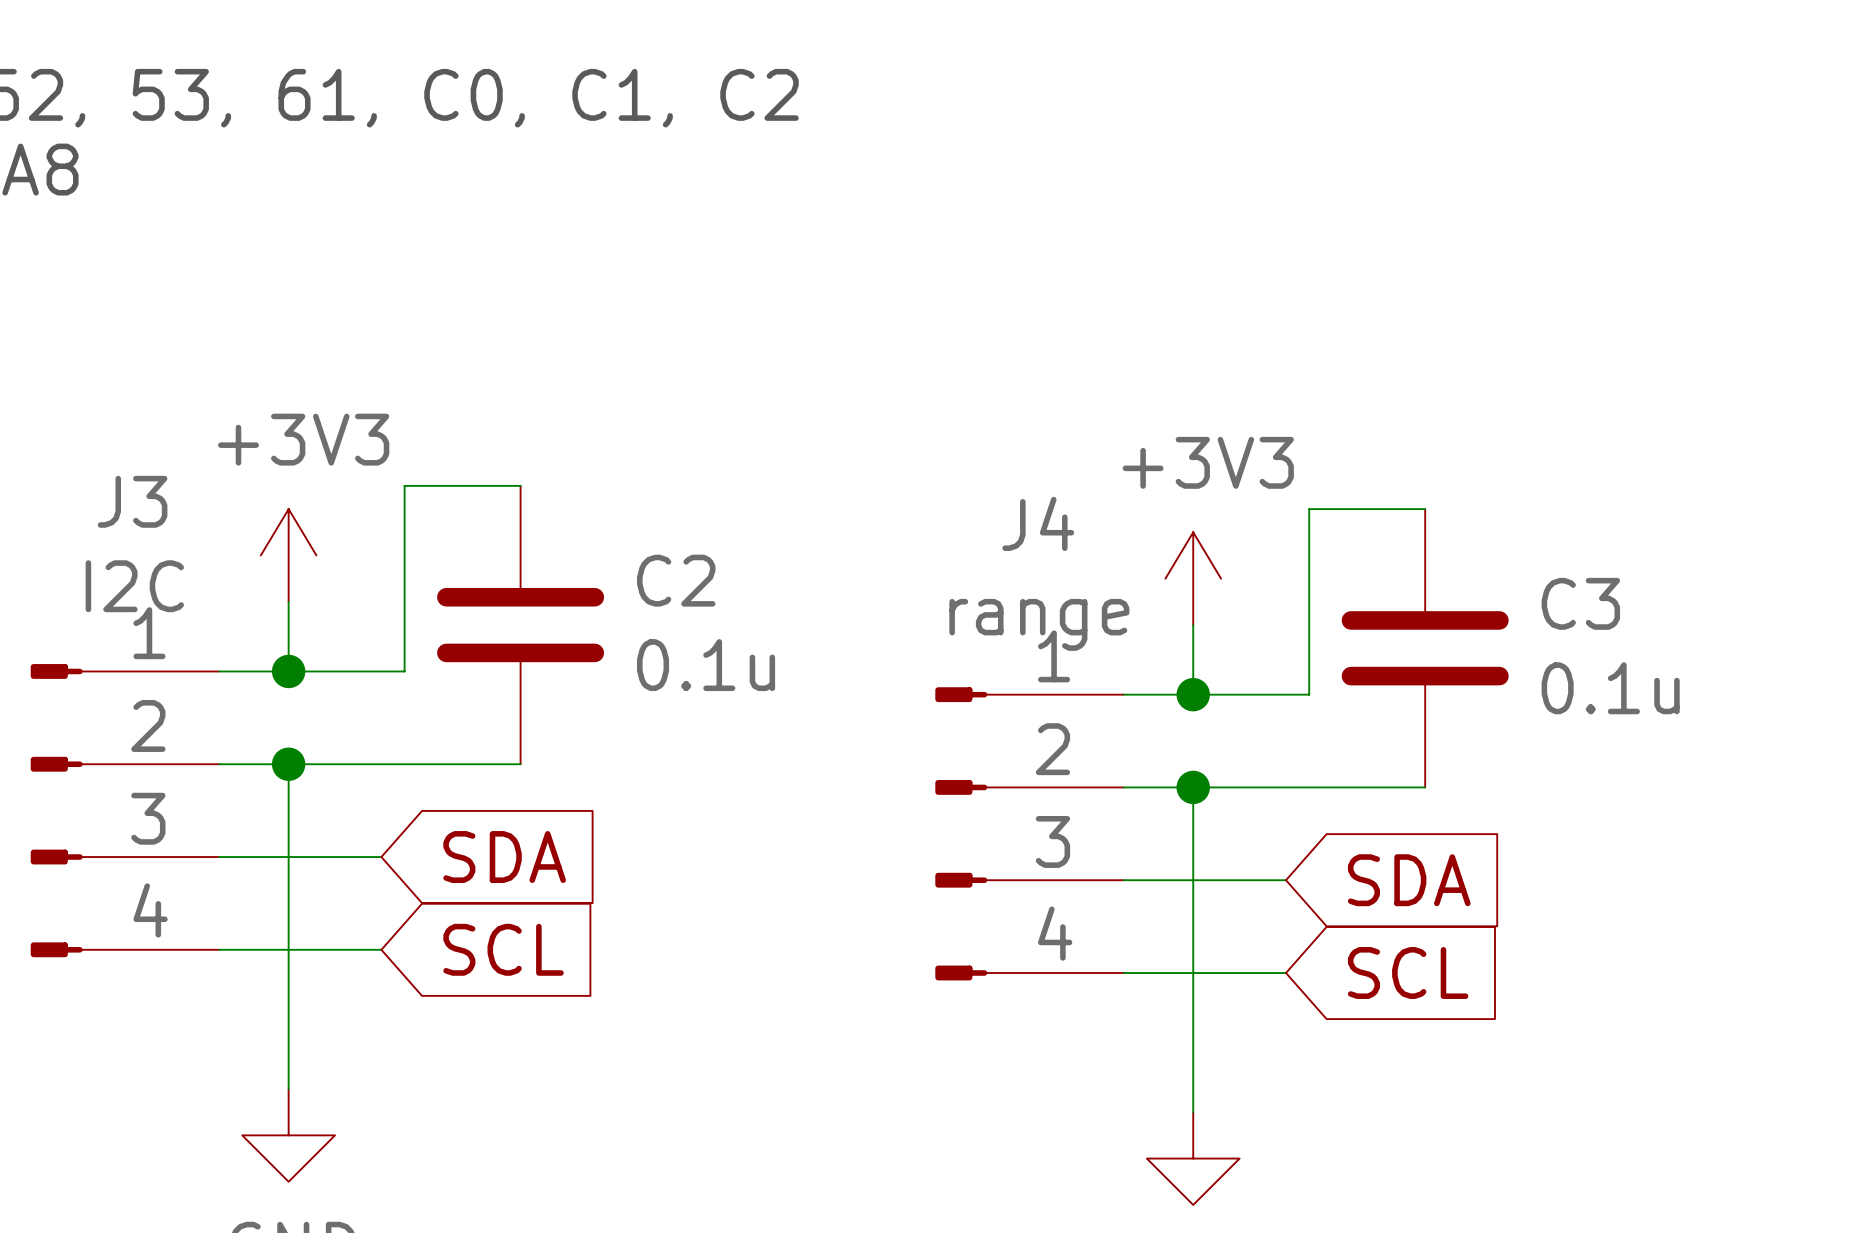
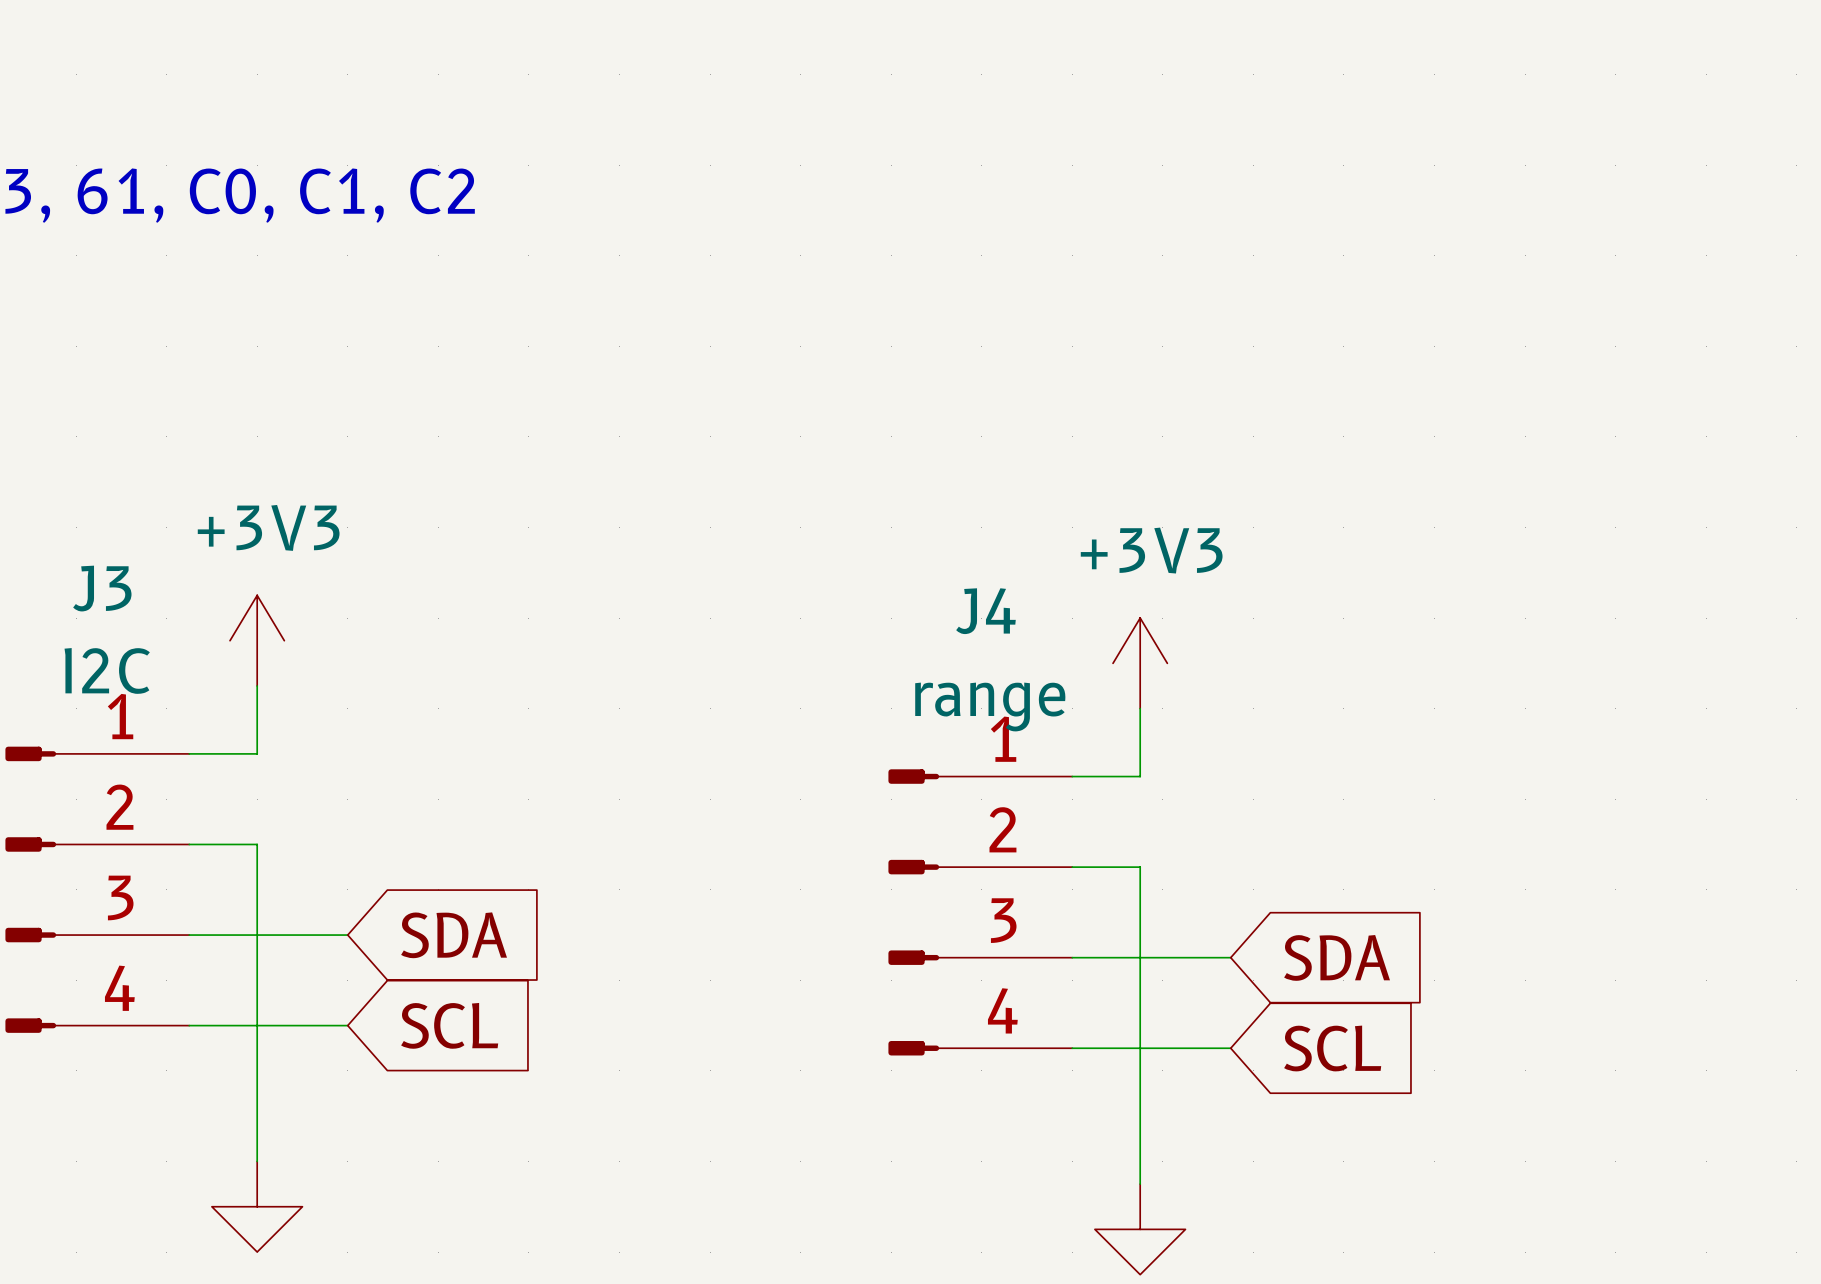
wire: (520, 485) (404, 485) (404, 671) (288, 671) -> none
wire: (1425, 509) (1309, 509) (1309, 694) (1193, 694) -> none
C2: 0.1u (520, 625) -> none
C3: 0.1u (1425, 648) -> none
junction: (288, 671) -> none
junction: (1193, 694) -> none
wire: (288, 764) (520, 764) -> none
junction: (288, 764) -> none
wire: (1193, 787) (1425, 787) -> none
junction: (1193, 787) -> none

